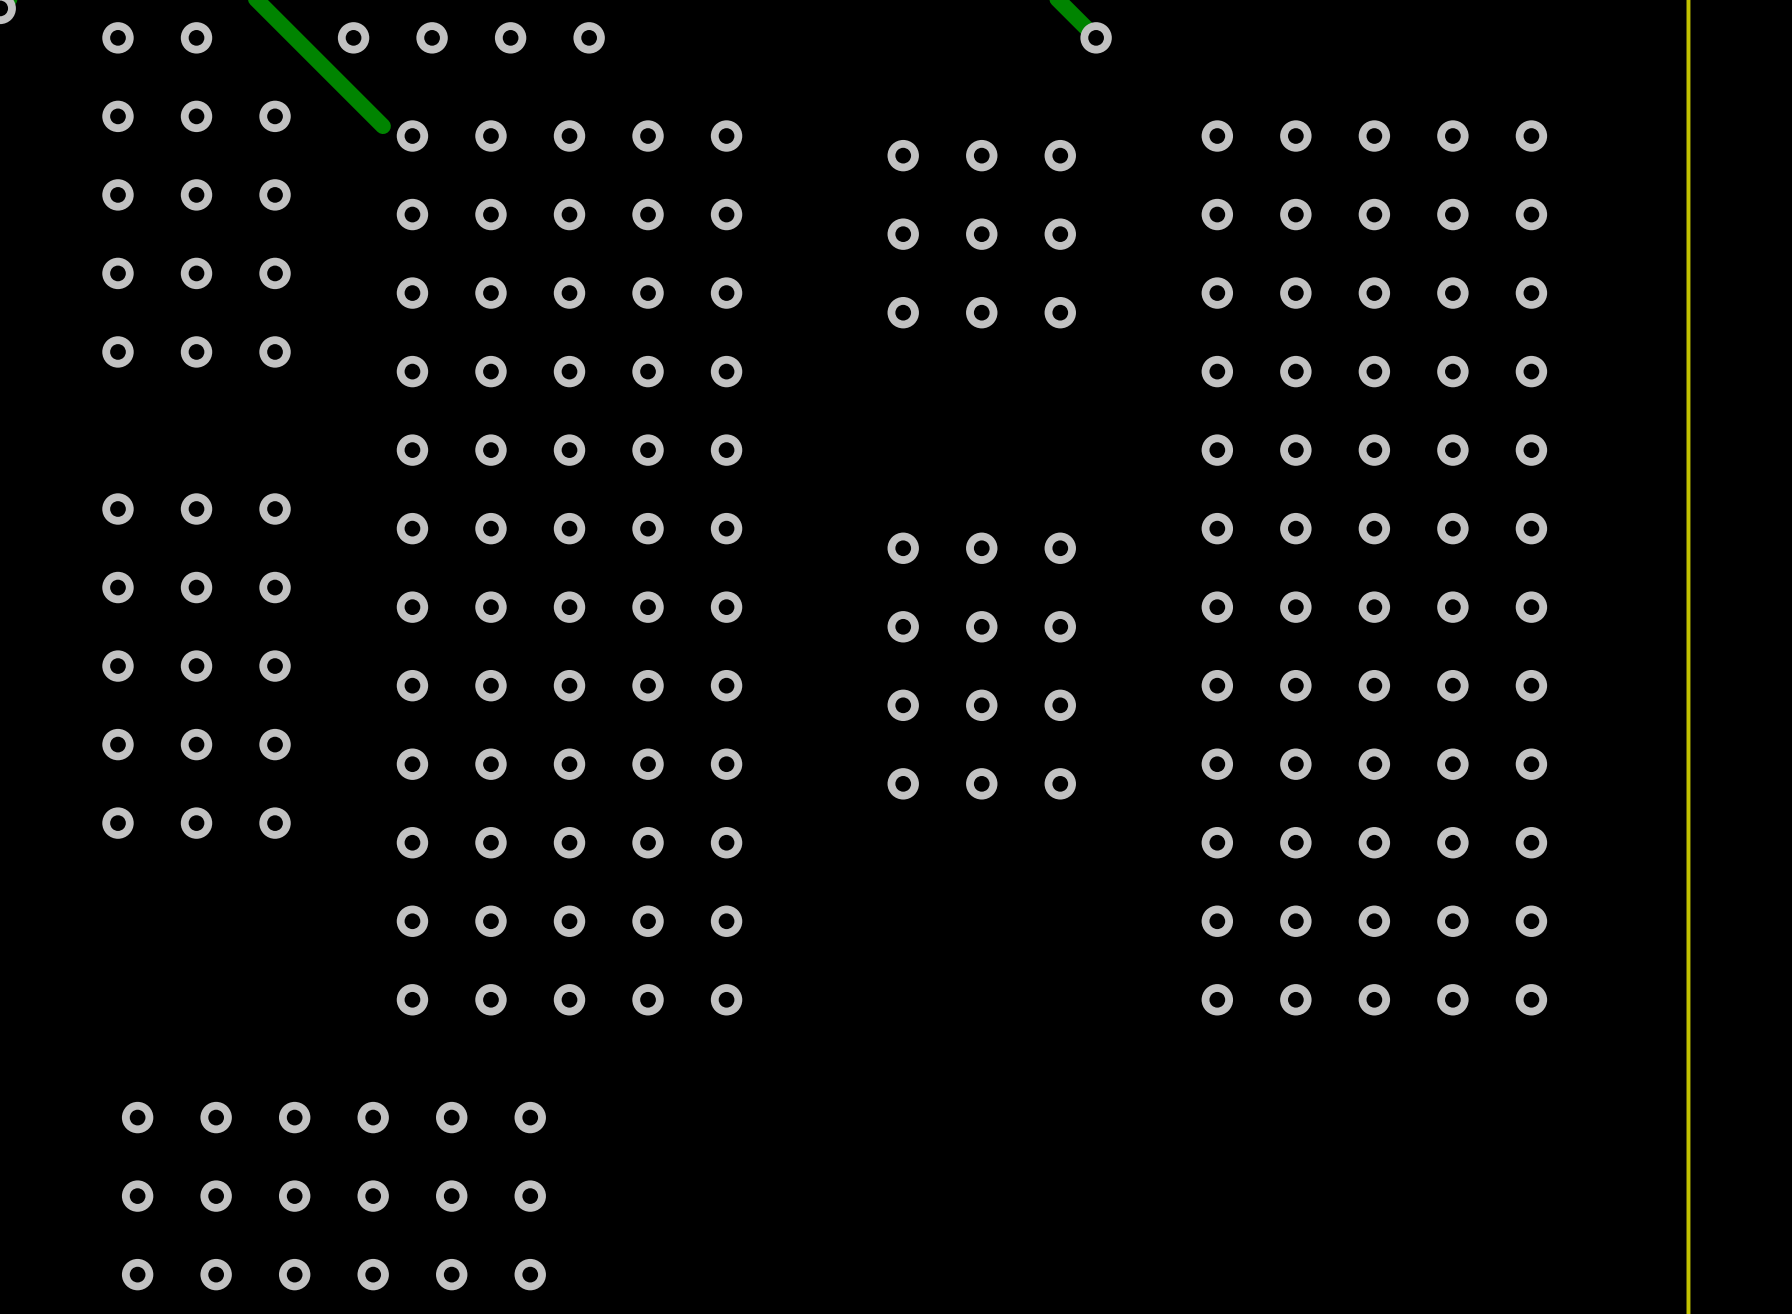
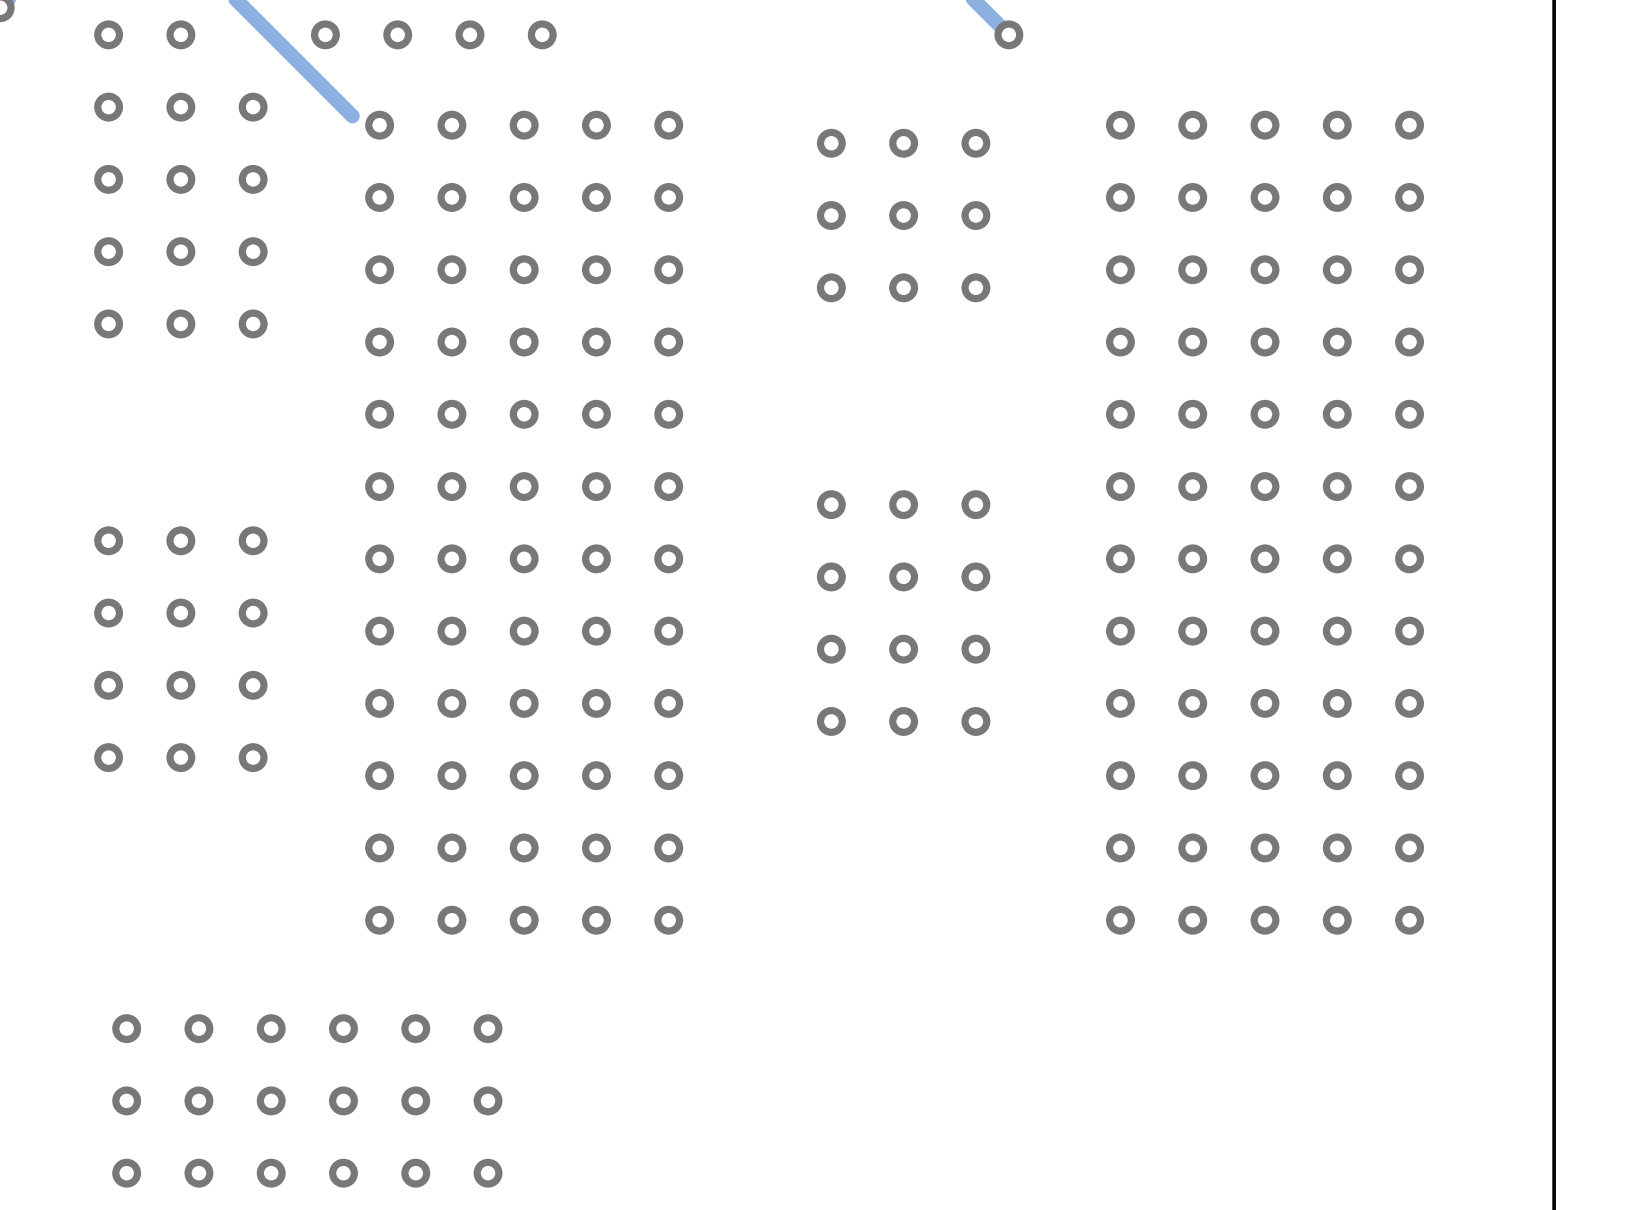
via: (117, 509) -> none
via: (196, 509) -> none
via: (275, 509) -> none

